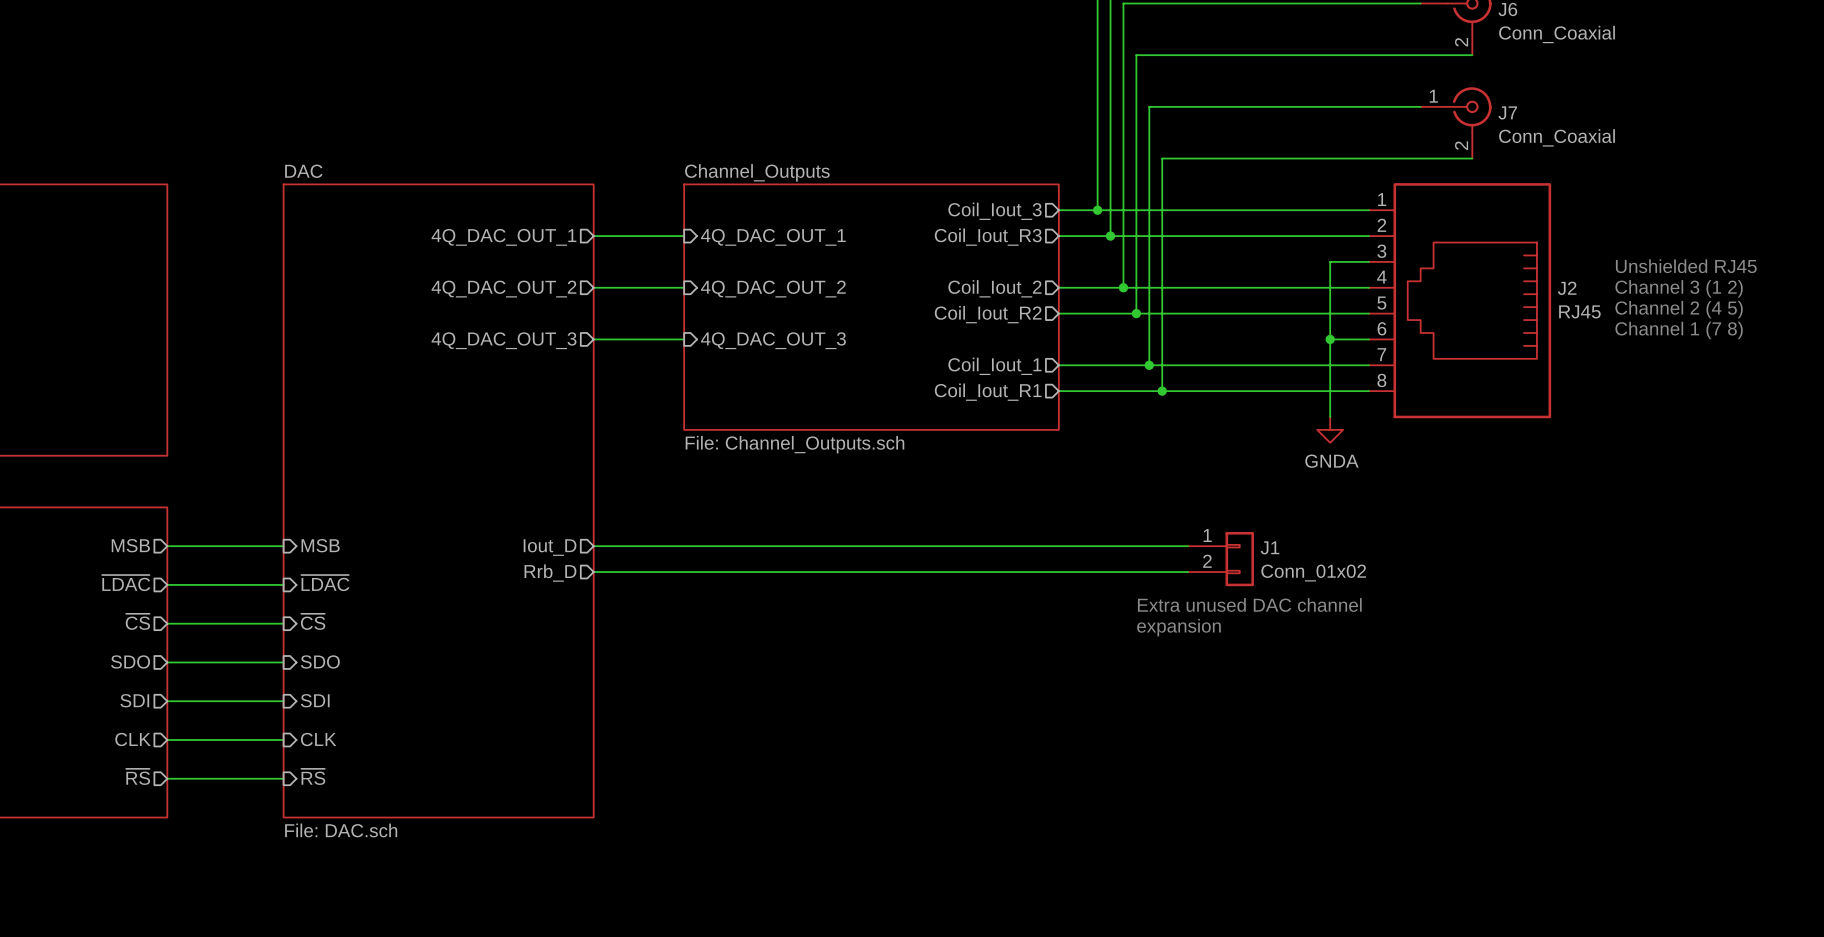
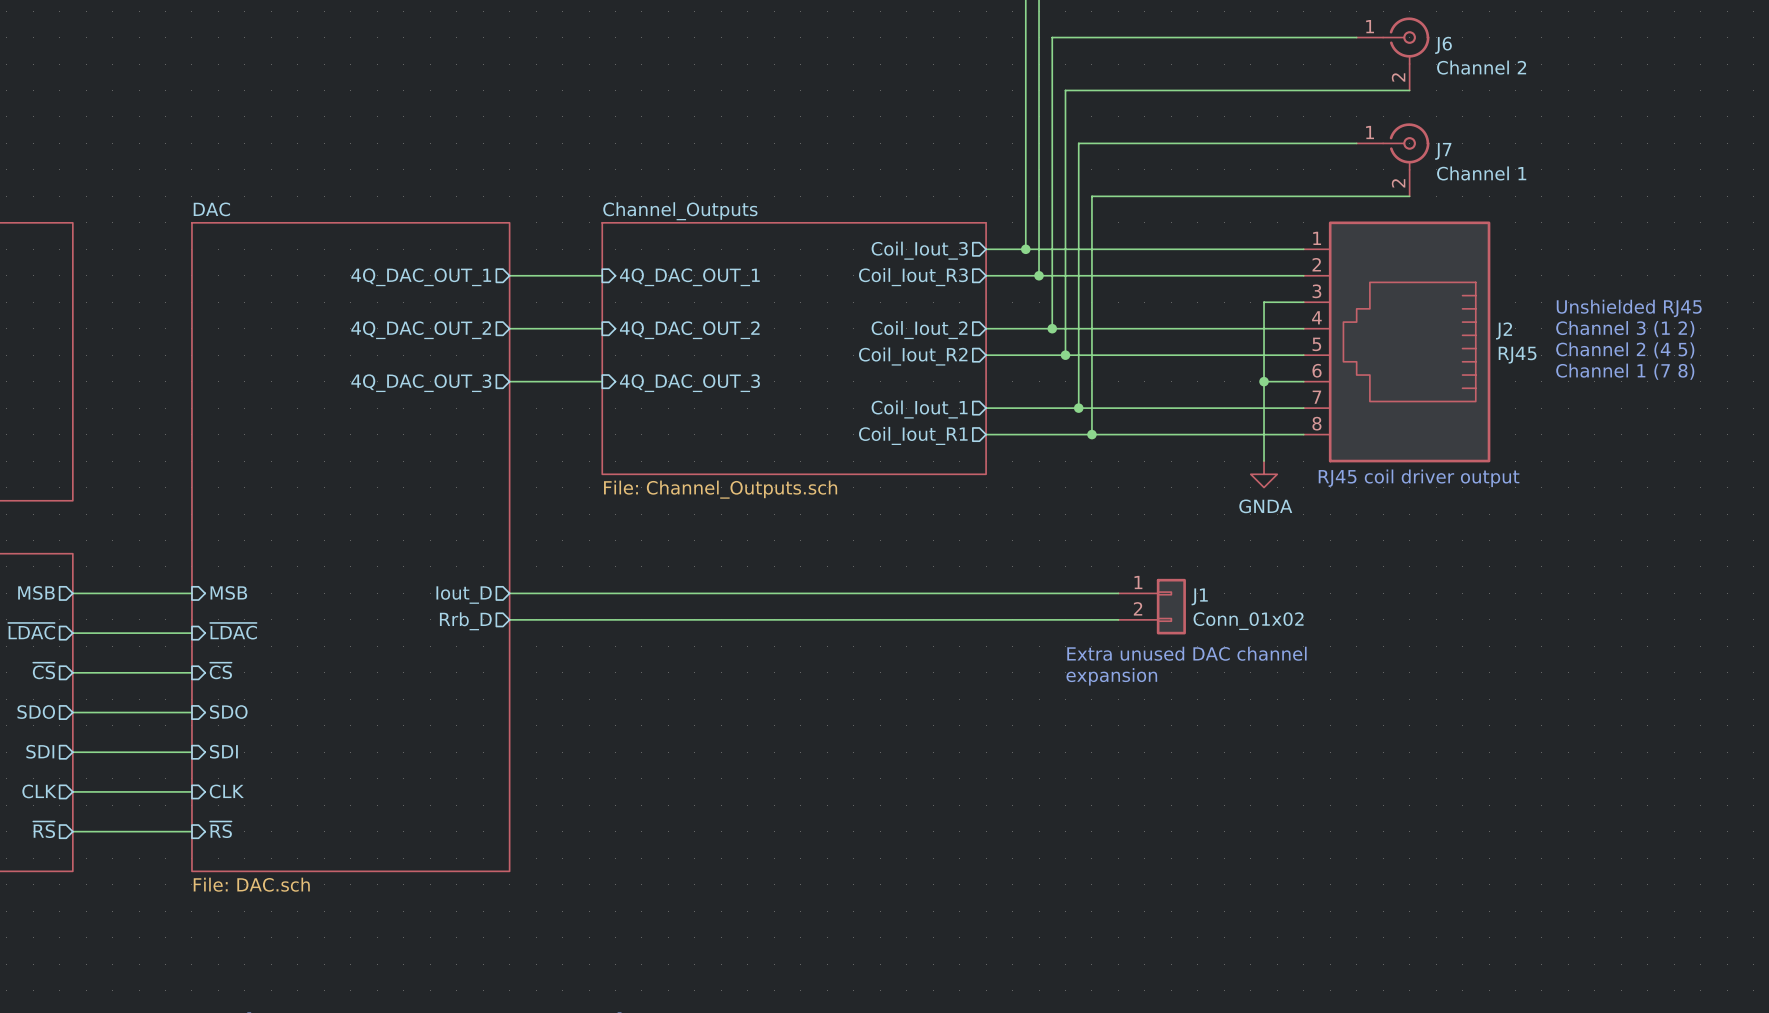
J6 value: Conn_Coaxial (1557, 34) -> Channel 2 (1481, 67)
J7 value: Conn_Coaxial (1557, 137) -> Channel 1 (1481, 173)
text: none -> RJ45 coil driver output (1419, 478)

